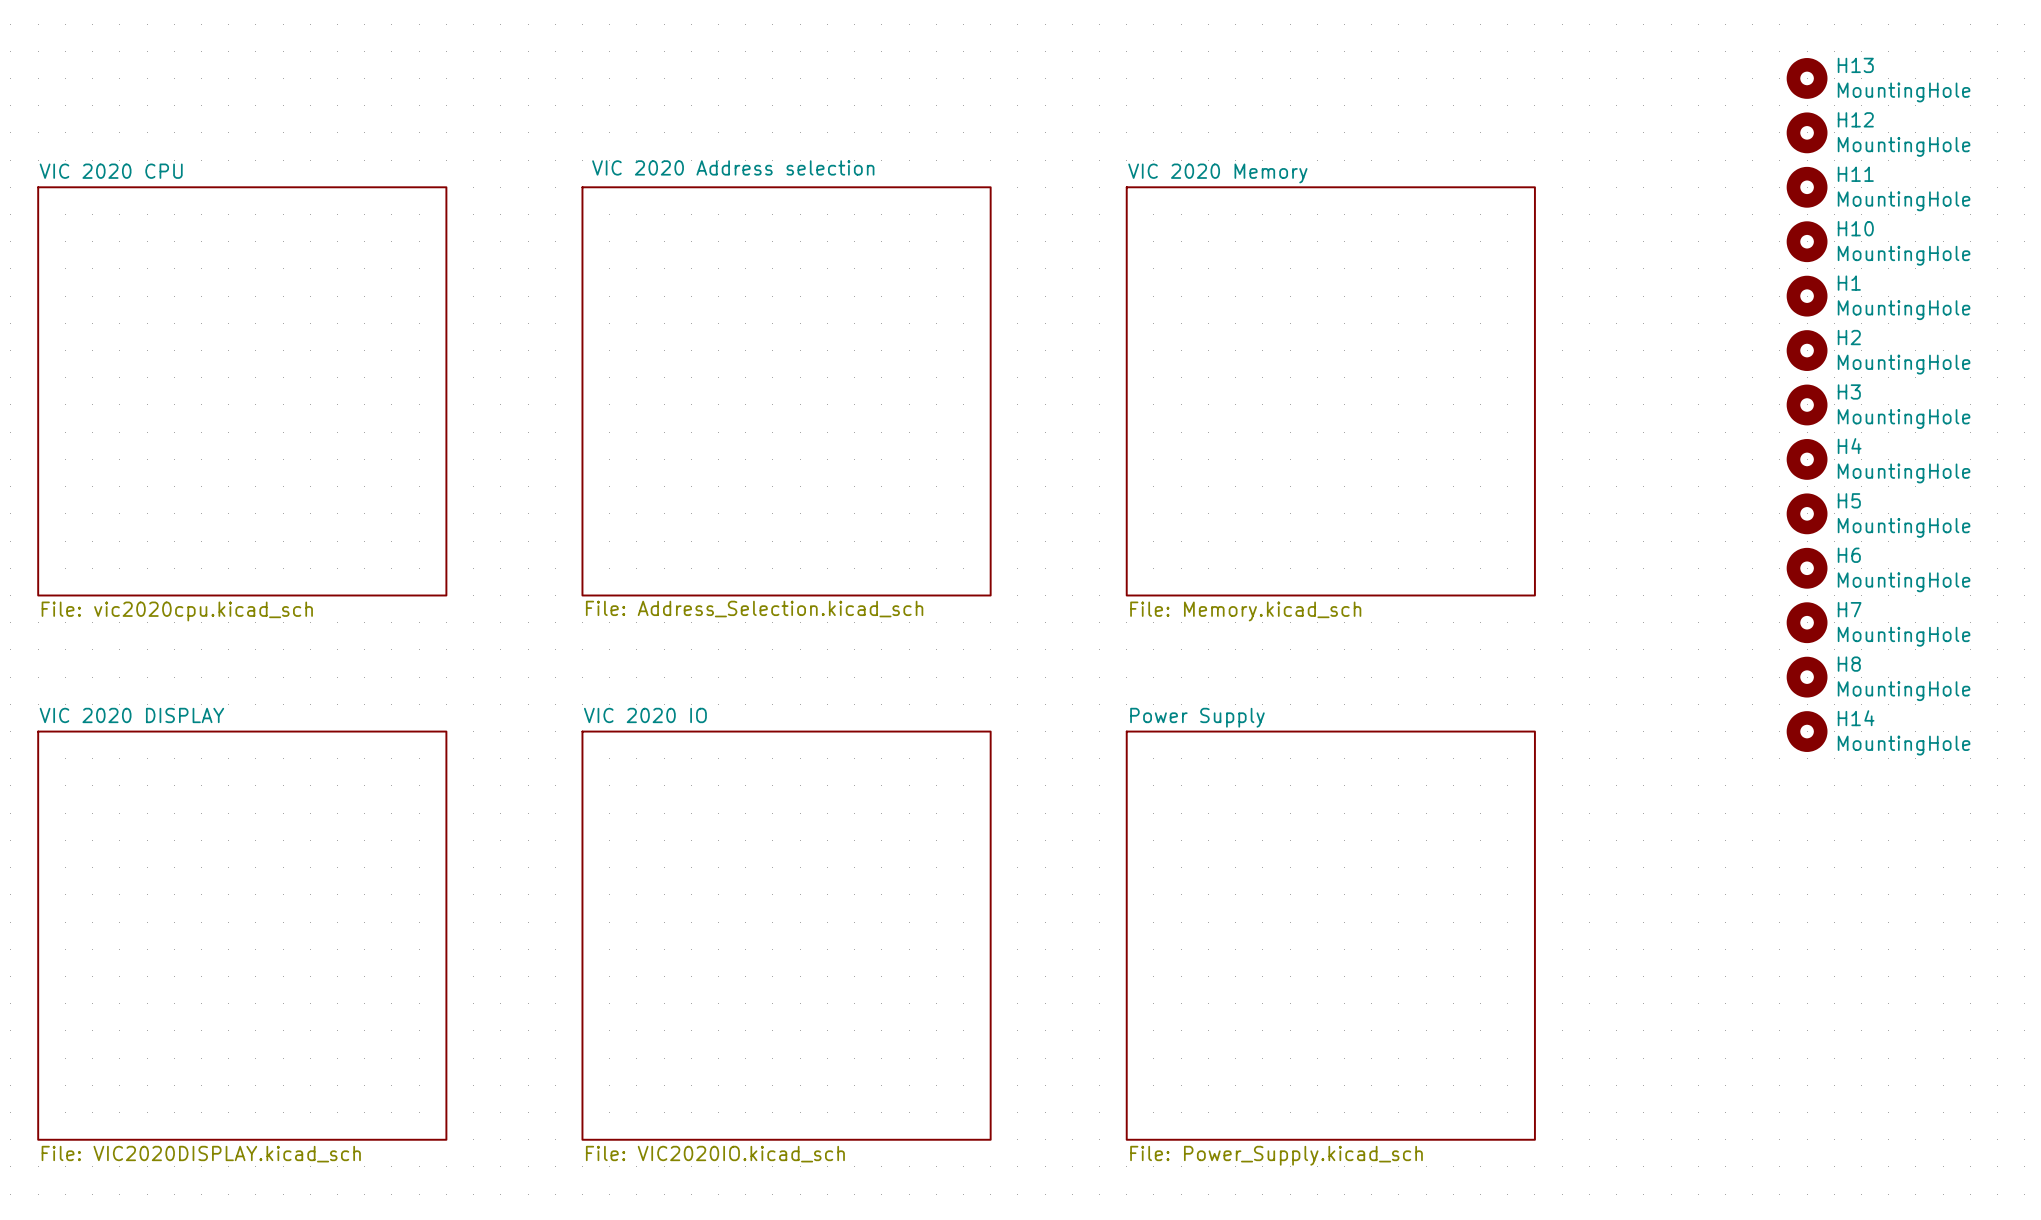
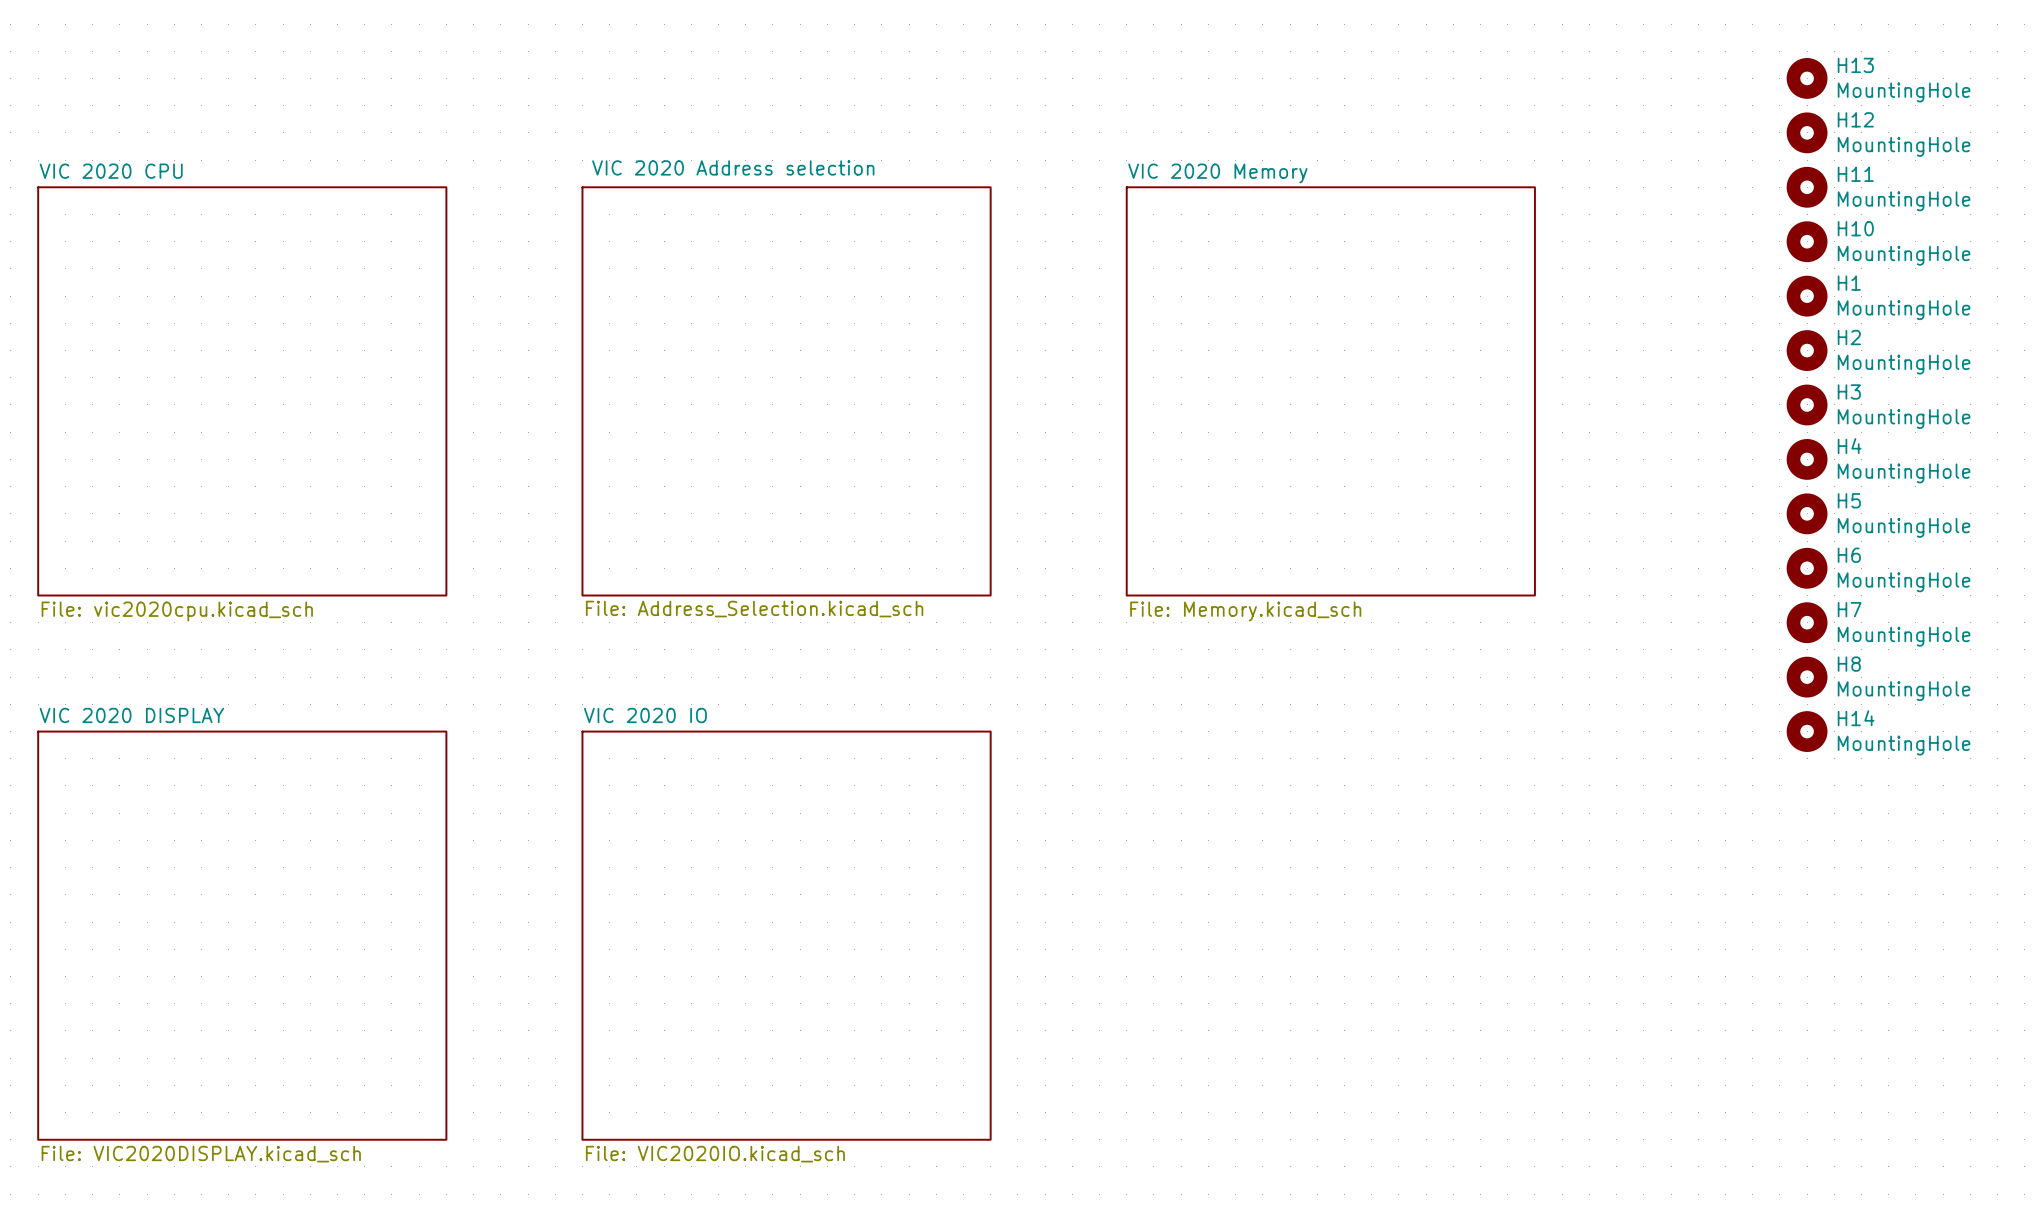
sheet Power Supply: File: Power_Supply.kicad_sch (1330, 935) -> none

